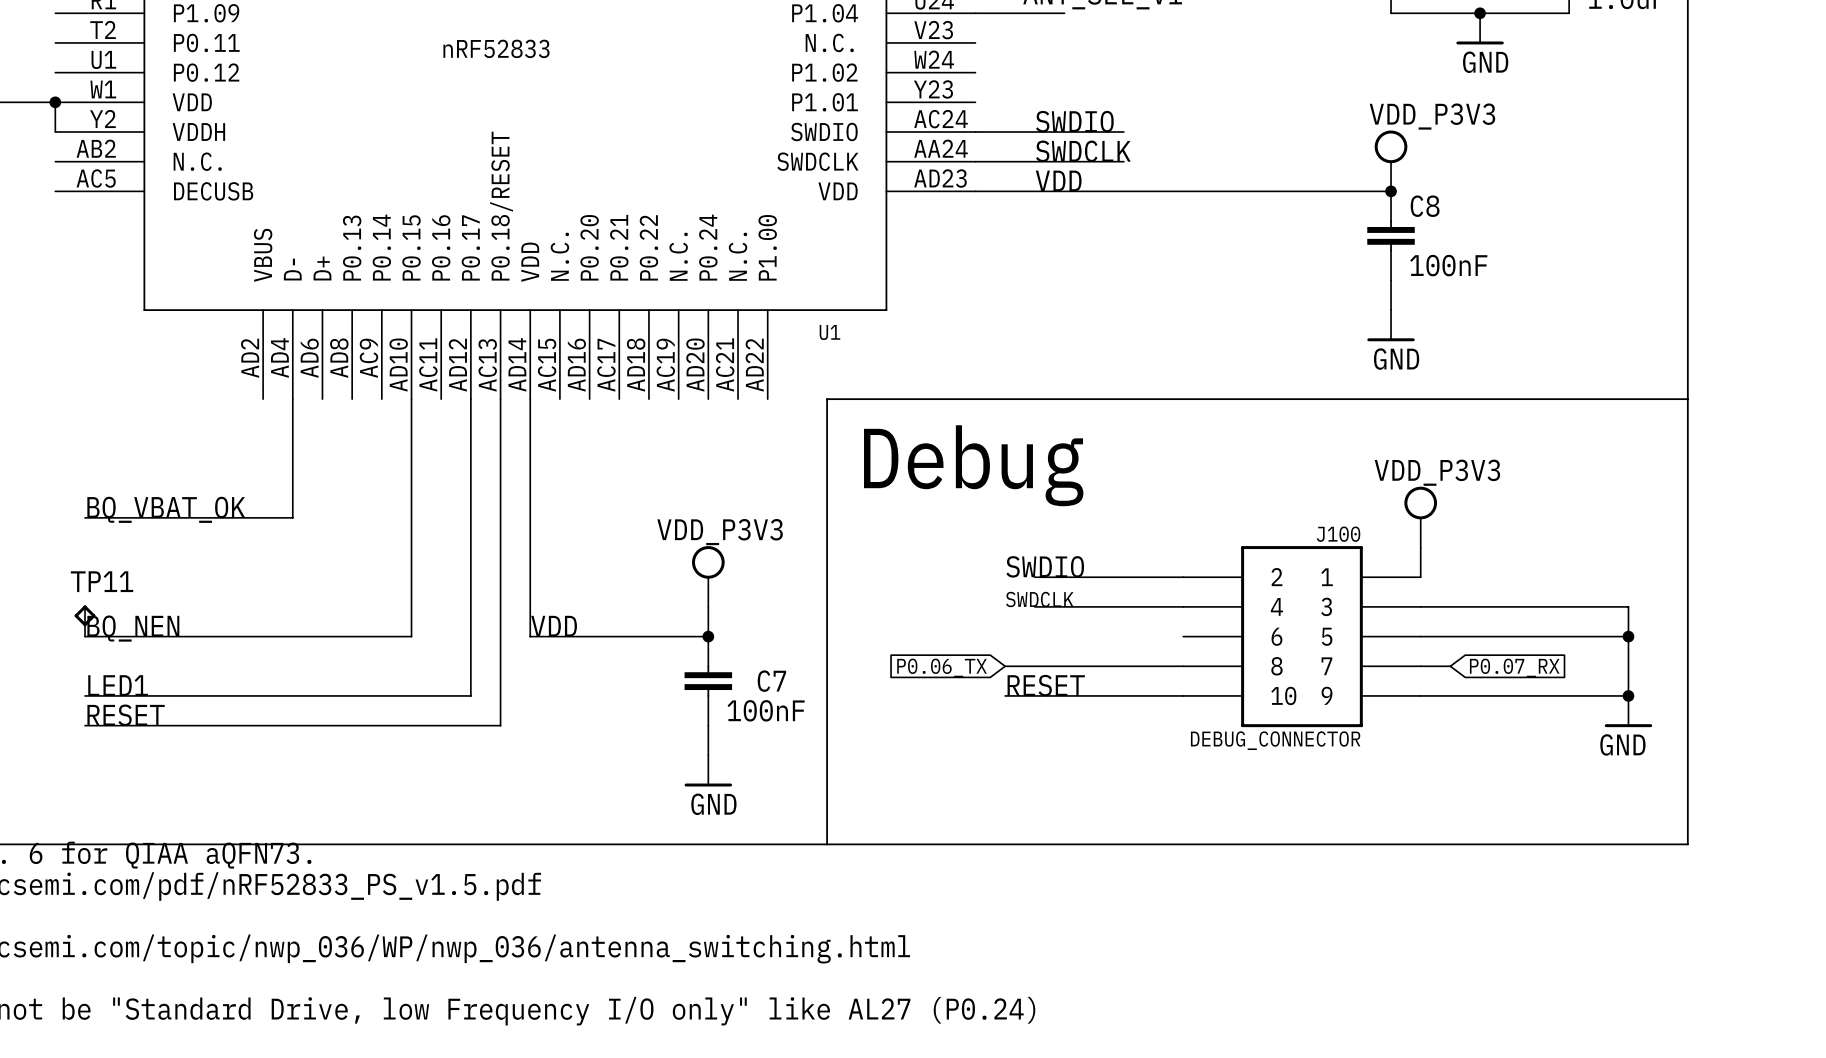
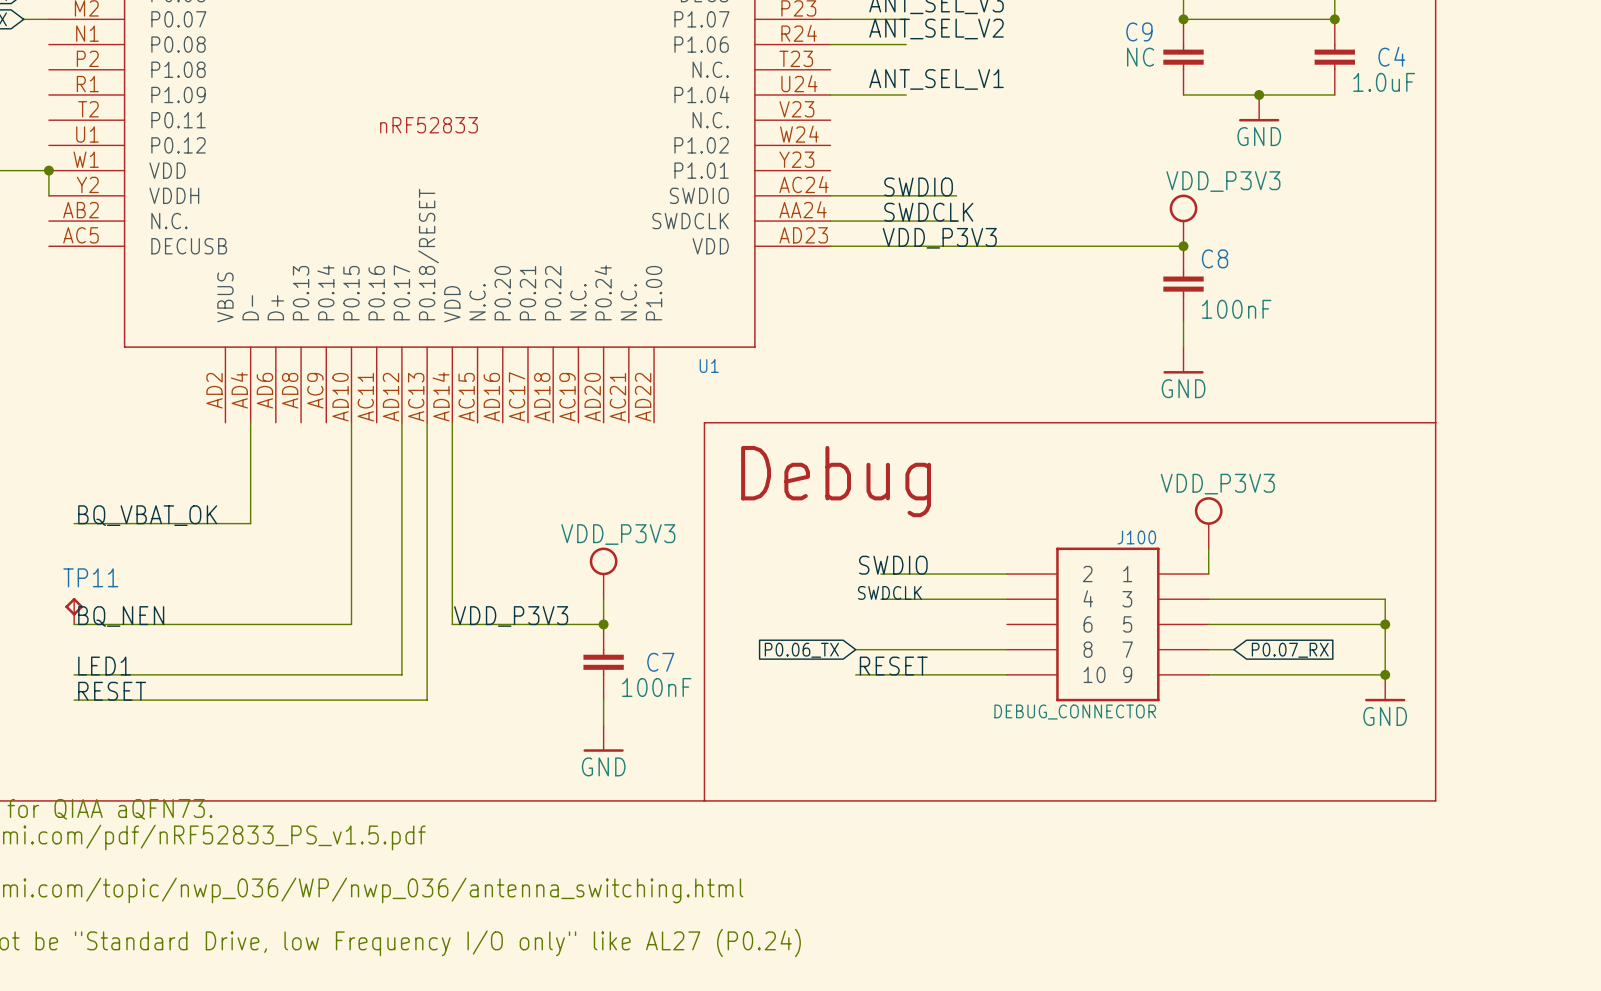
label: VDD (1058, 180) -> VDD_P3V3 (939, 238)
label: VDD (554, 626) -> VDD_P3V3 (511, 616)

